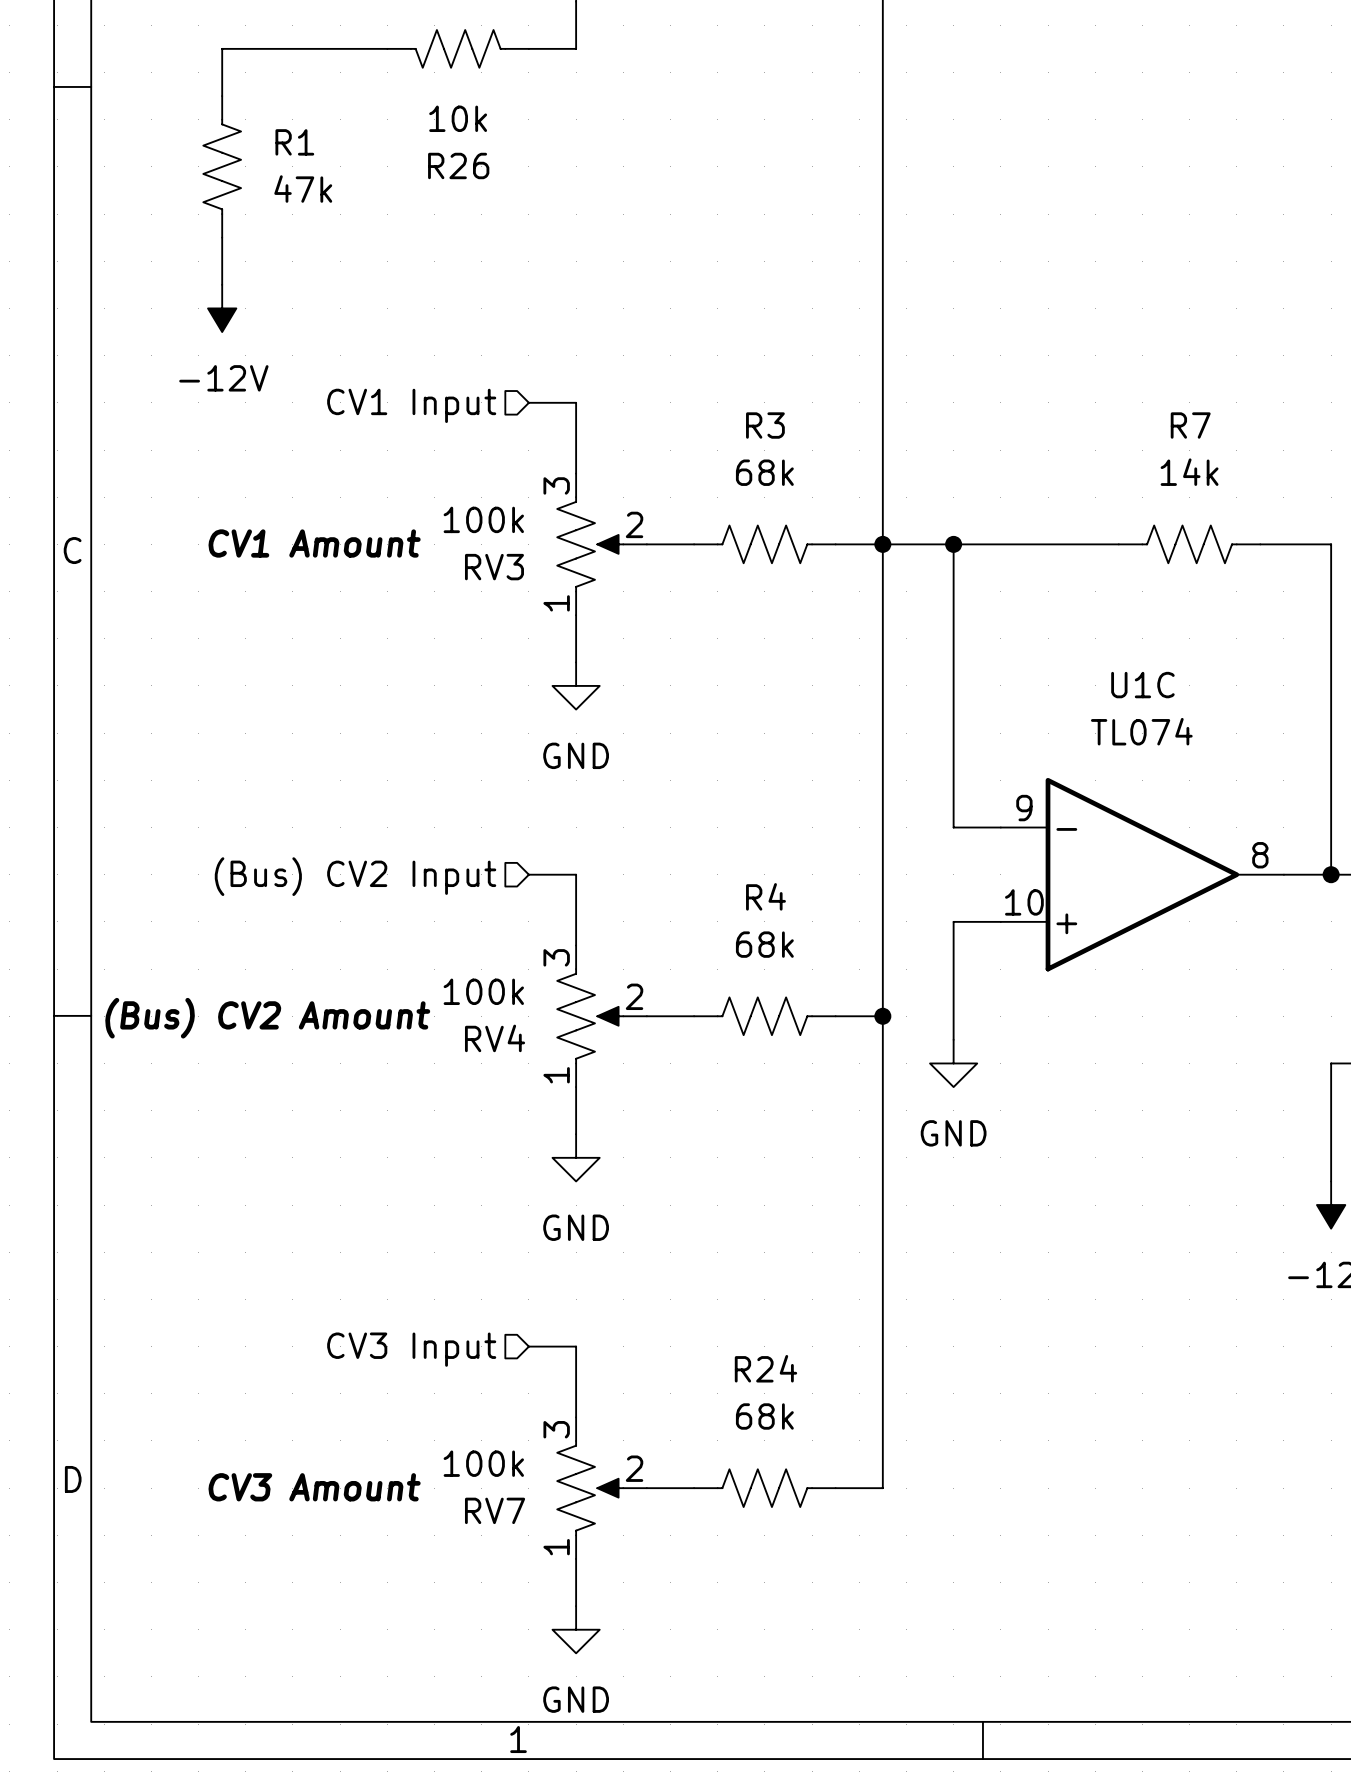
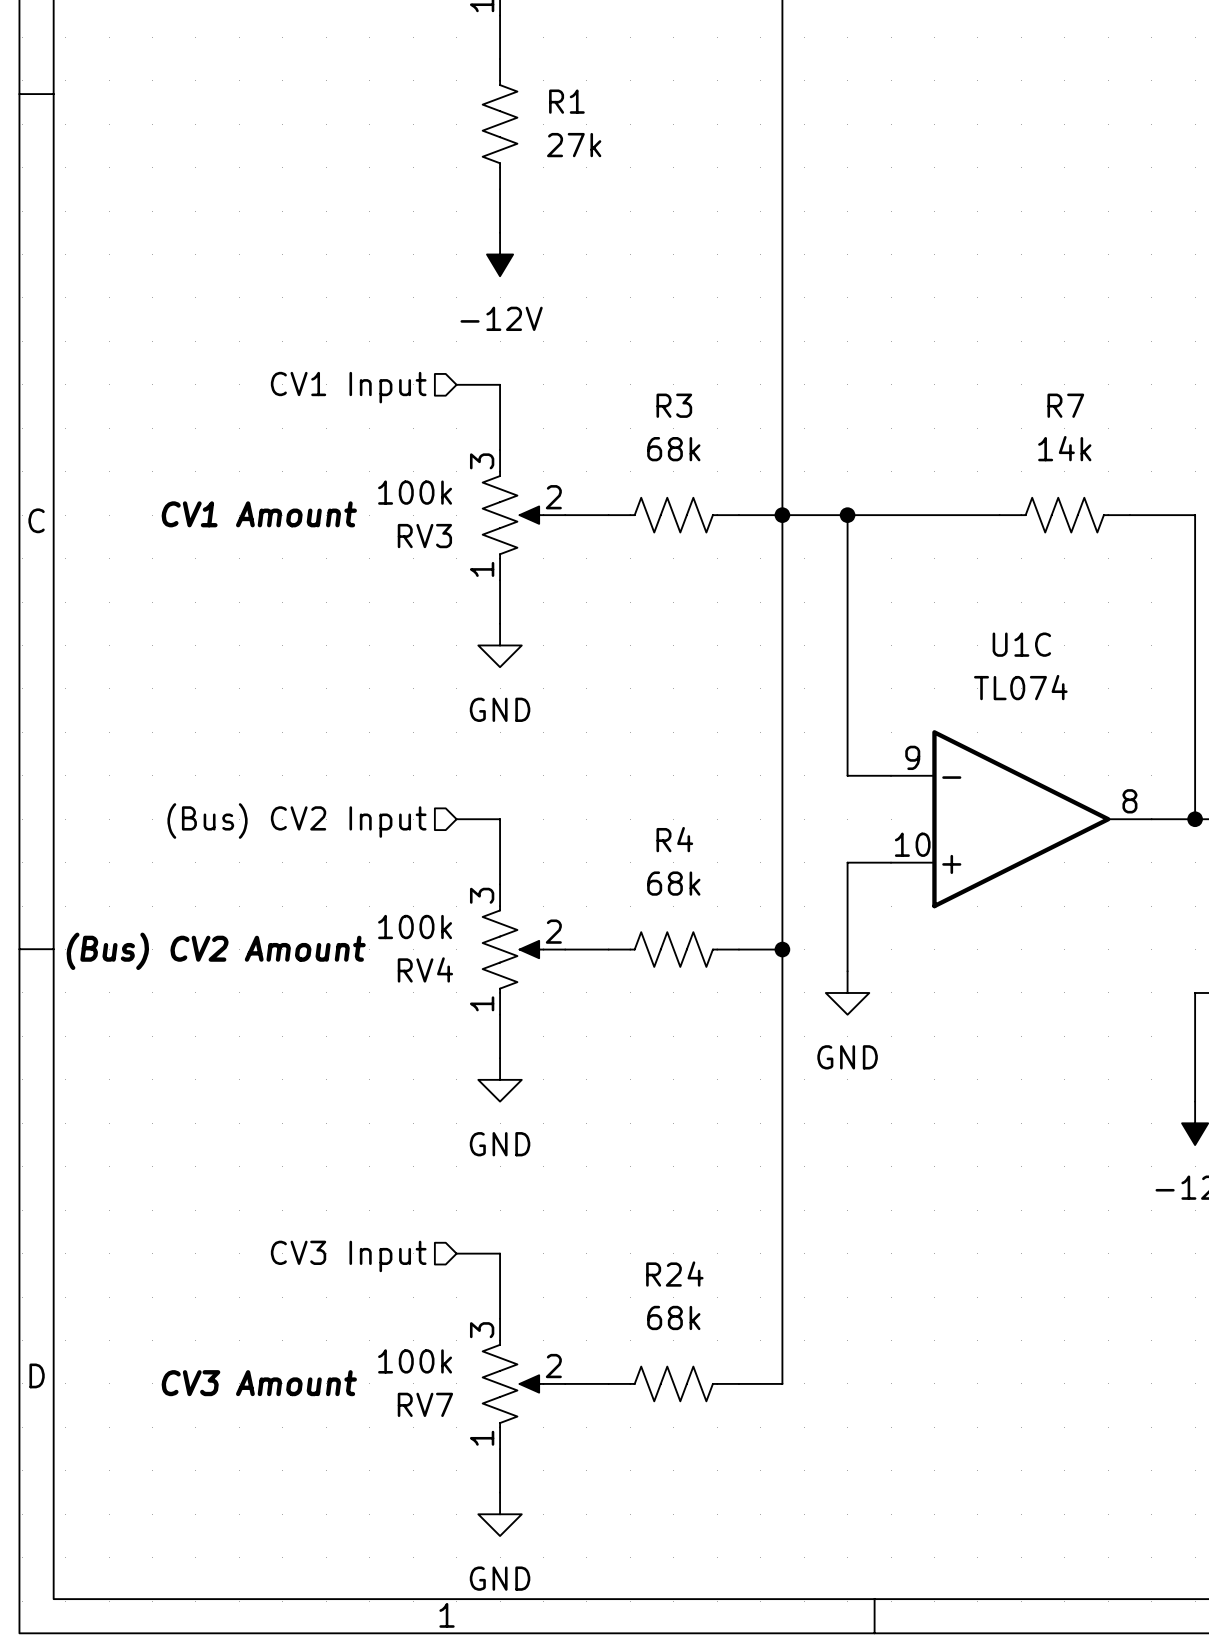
wire: (387, 48) (222, 48) (222, 96) -> none
R26: 10k (458, 48) -> none
wire: (528, 48) (576, 48) -> none
R1 position: (222, 166) -> (500, 124)
R1 value: 47k (303, 189) -> 27k (574, 145)
wire: (222, 237) (222, 284) -> (500, 189) (500, 232)
power symbol position: -12V (222, 308) -> -12V (500, 254)

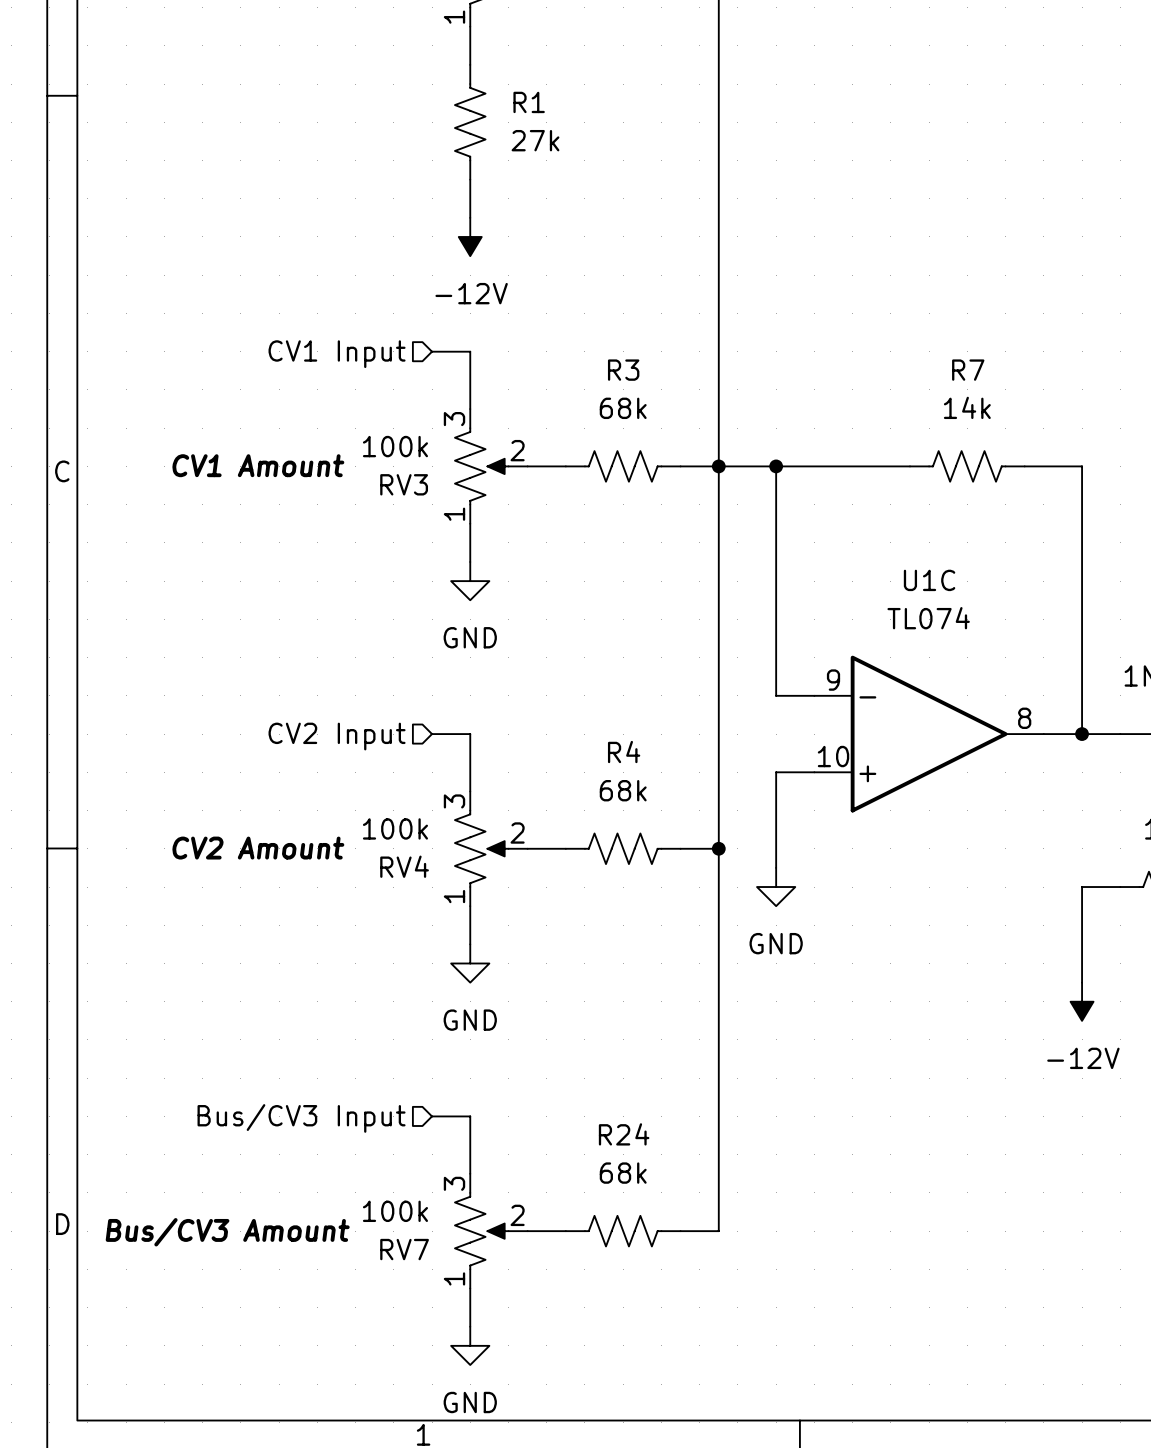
hierarchical label: (Bus) CV2 Input (296, 821) -> CV2 Input (337, 736)
RV4 text: (Bus) CV2 Amount (216, 951) -> CV2 Amount (258, 848)
hierarchical label: CV3 Input (348, 1256) -> Bus/CV3 Input (301, 1118)
RV7 text: CV3 Amount (259, 1383) -> Bus/CV3 Amount (227, 1232)

